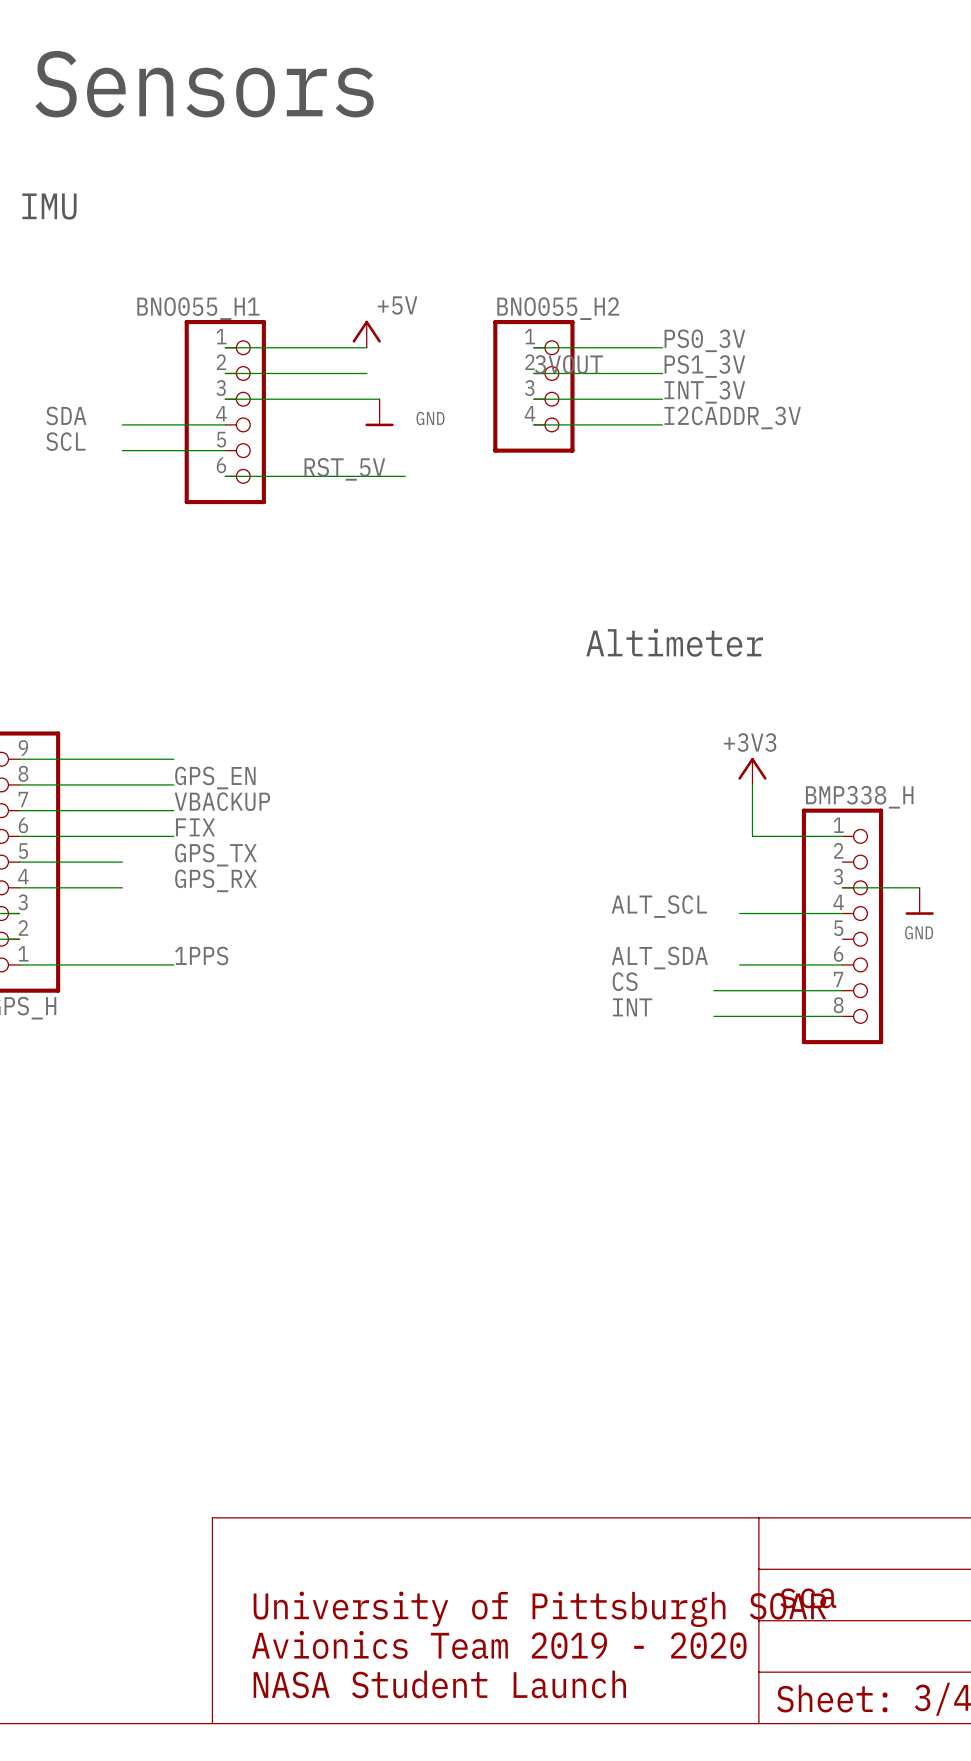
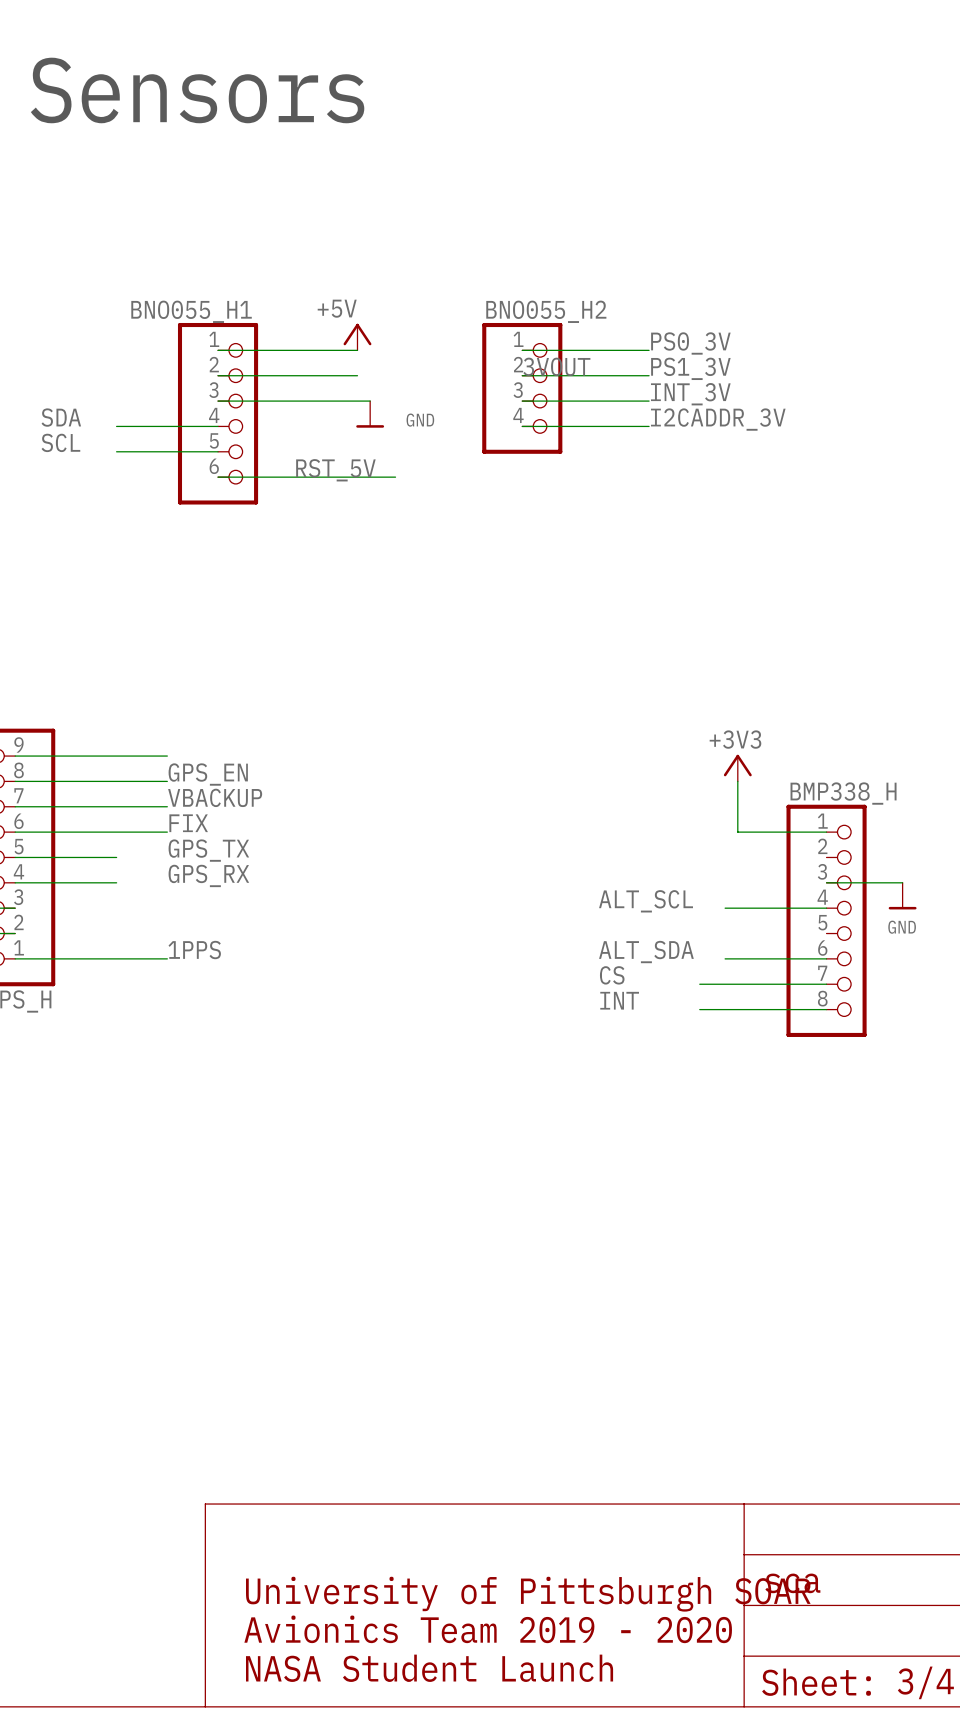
text: IMU (49, 206) -> none
power symbol text position: +5V (397, 305) -> +5V (337, 308)
text: Altimeter (674, 642) -> none

